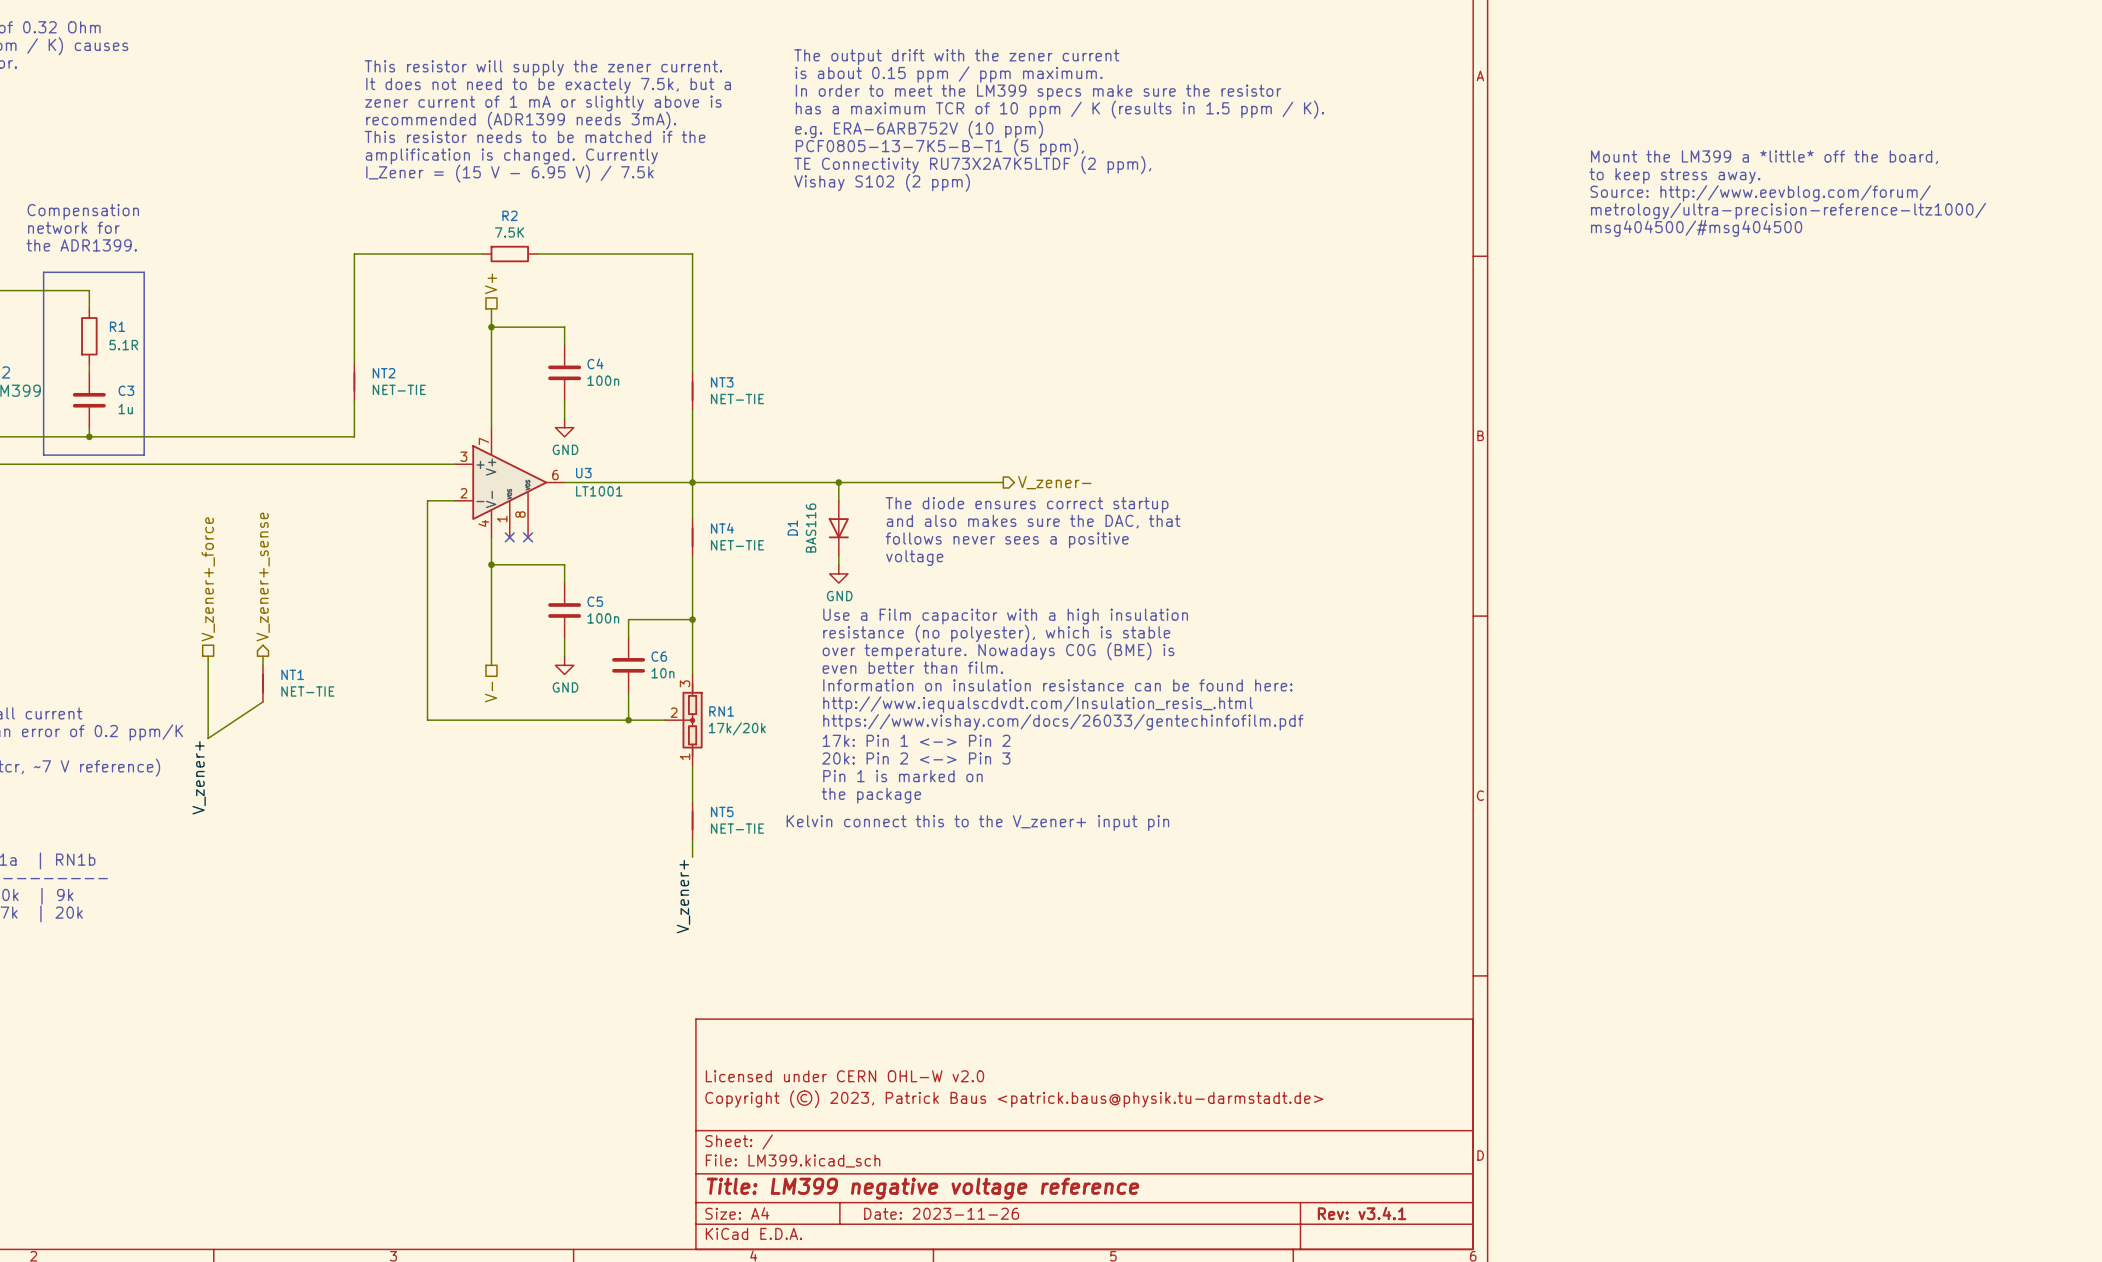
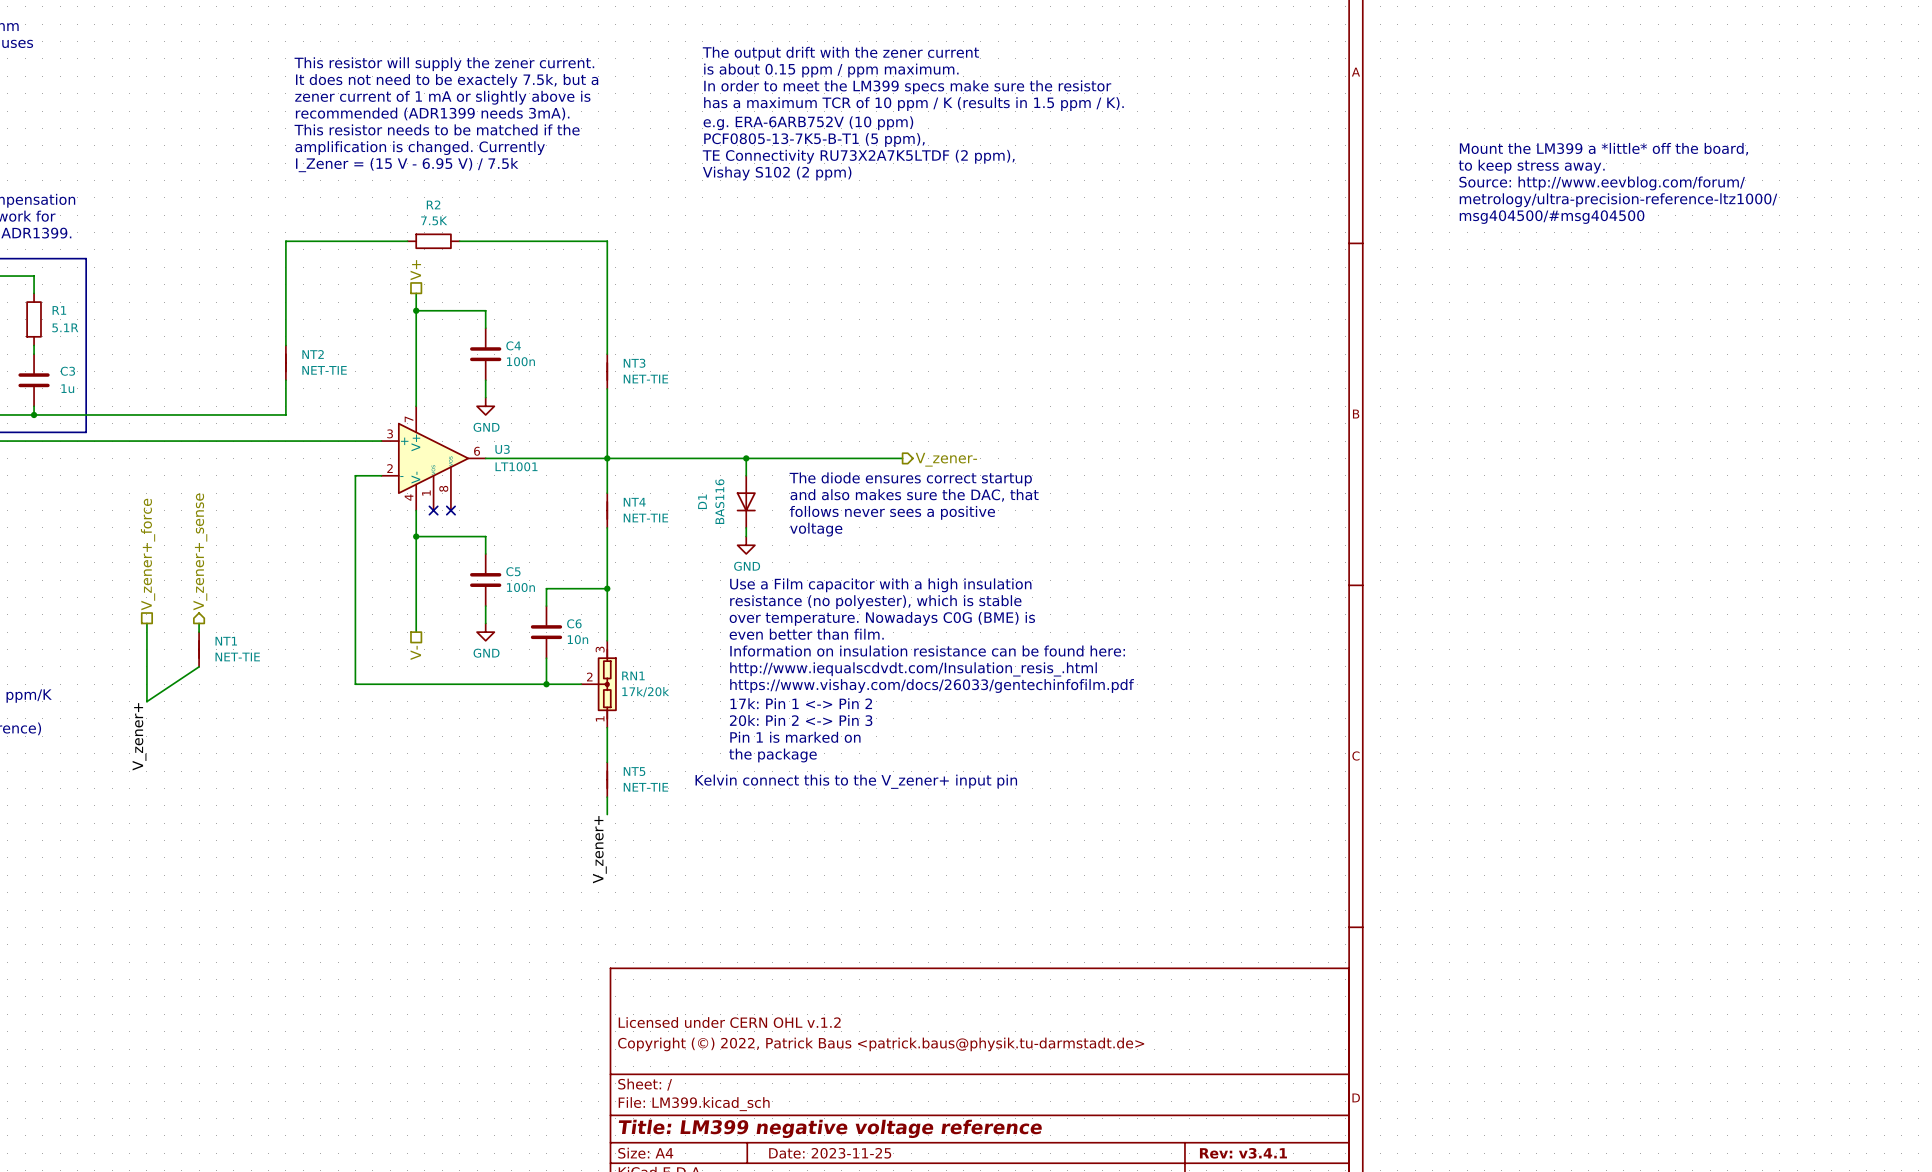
title block: Licensed under CERN OHL-W v2.0 (844, 1076) -> Licensed under CERN OHL v.1.2 (729, 1022)
title block: Copyright (©) 2023, Patrick Baus <patrick.baus@physik.tu-darmstadt.de> (1014, 1099) -> Copyright (©) 2022, Patrick Baus <patrick.baus@physik.tu-darmstadt.de> (881, 1044)
title block: Date: 2023-11-26 (941, 1213) -> Date: 2023-11-25 (830, 1153)

